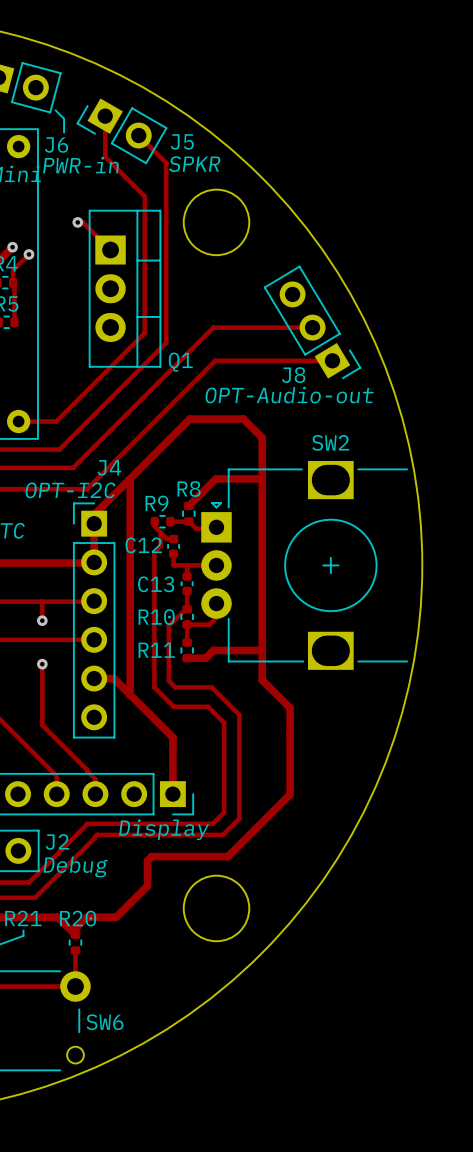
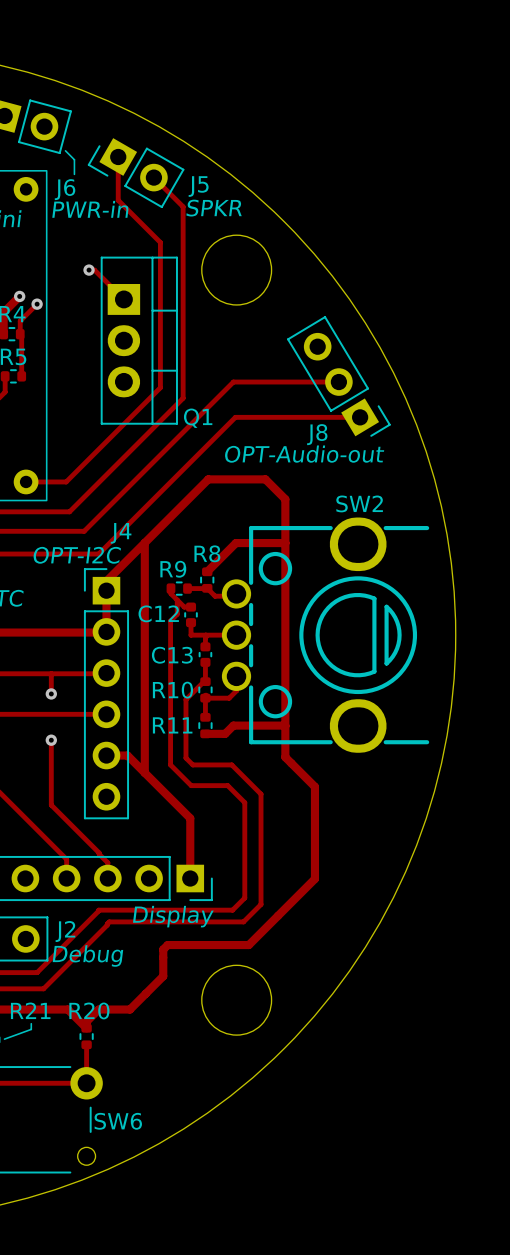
SW2 footprint: [201, 461, 408, 670] -> [221, 517, 430, 753]

